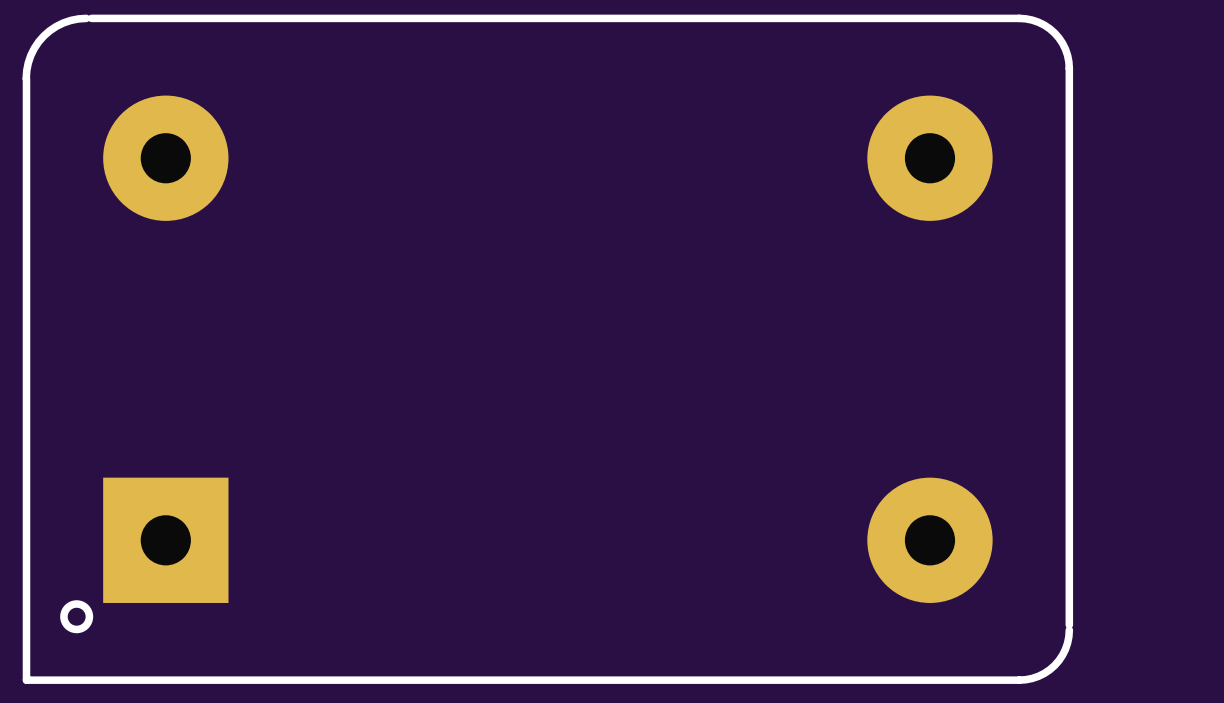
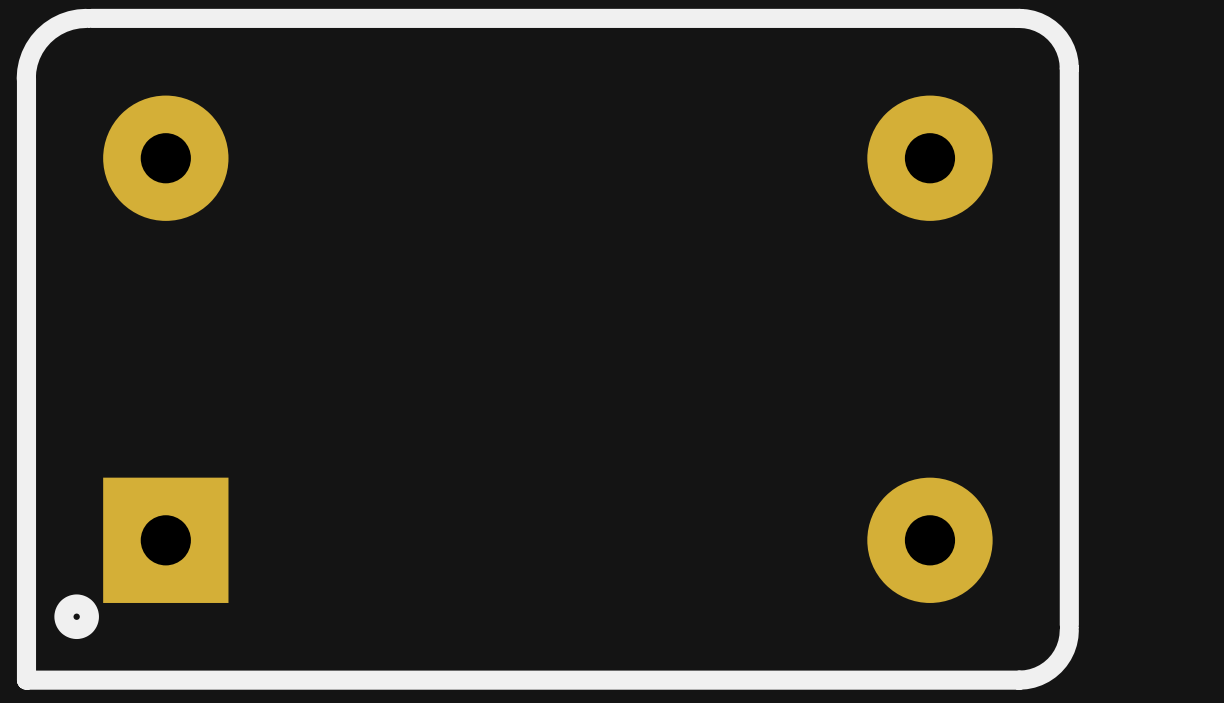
part footprint: [22, 14, 1074, 684] -> [16, 8, 1079, 690]

